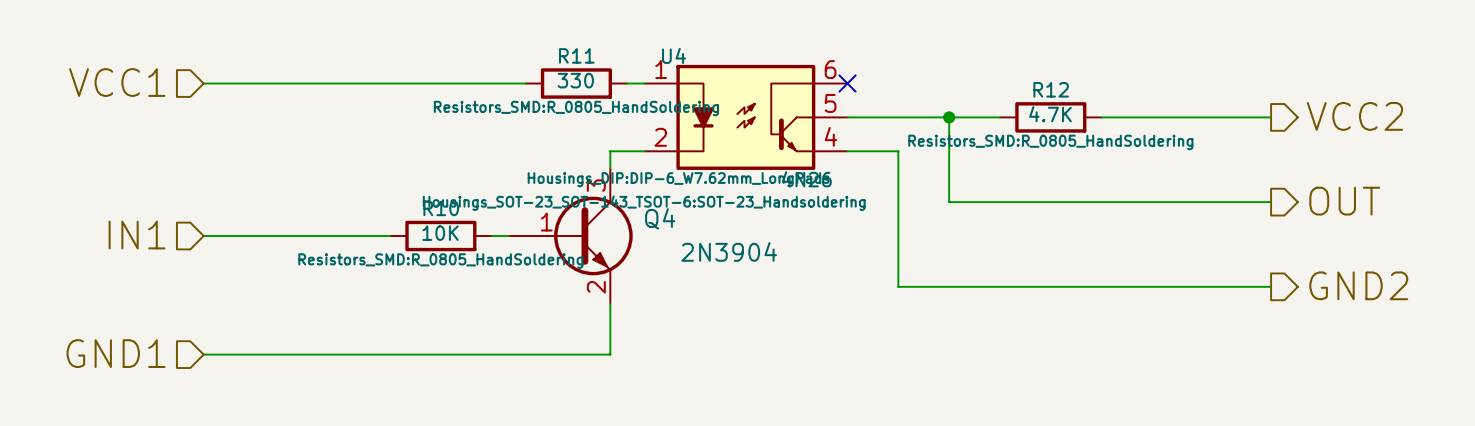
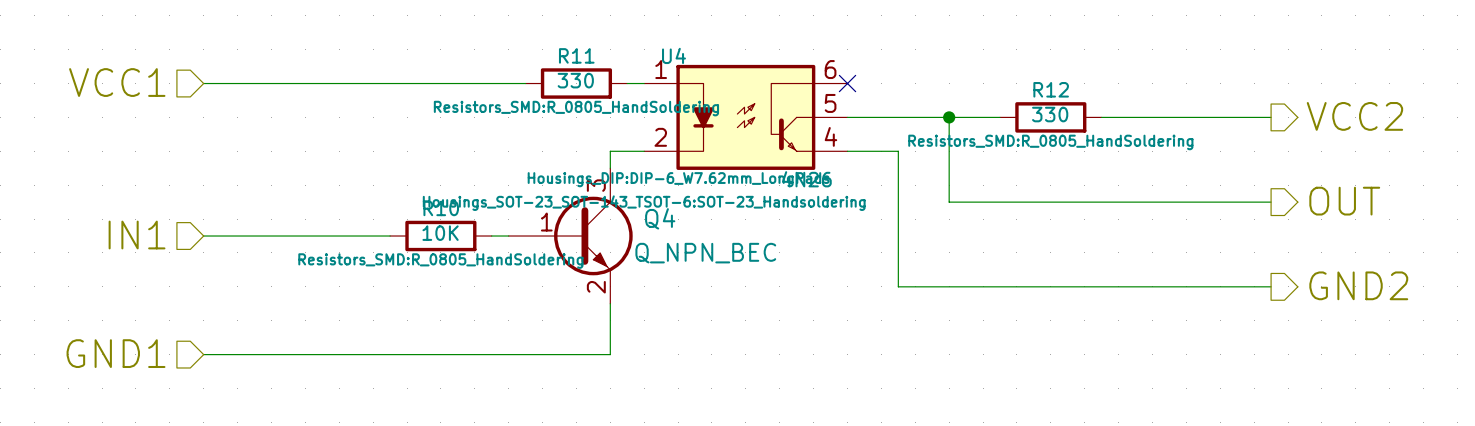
R12 value: 4.7K (1050, 114) -> 330 (1050, 114)
Q4 value: 2N3904 (729, 251) -> Q_NPN_BEC (705, 253)

